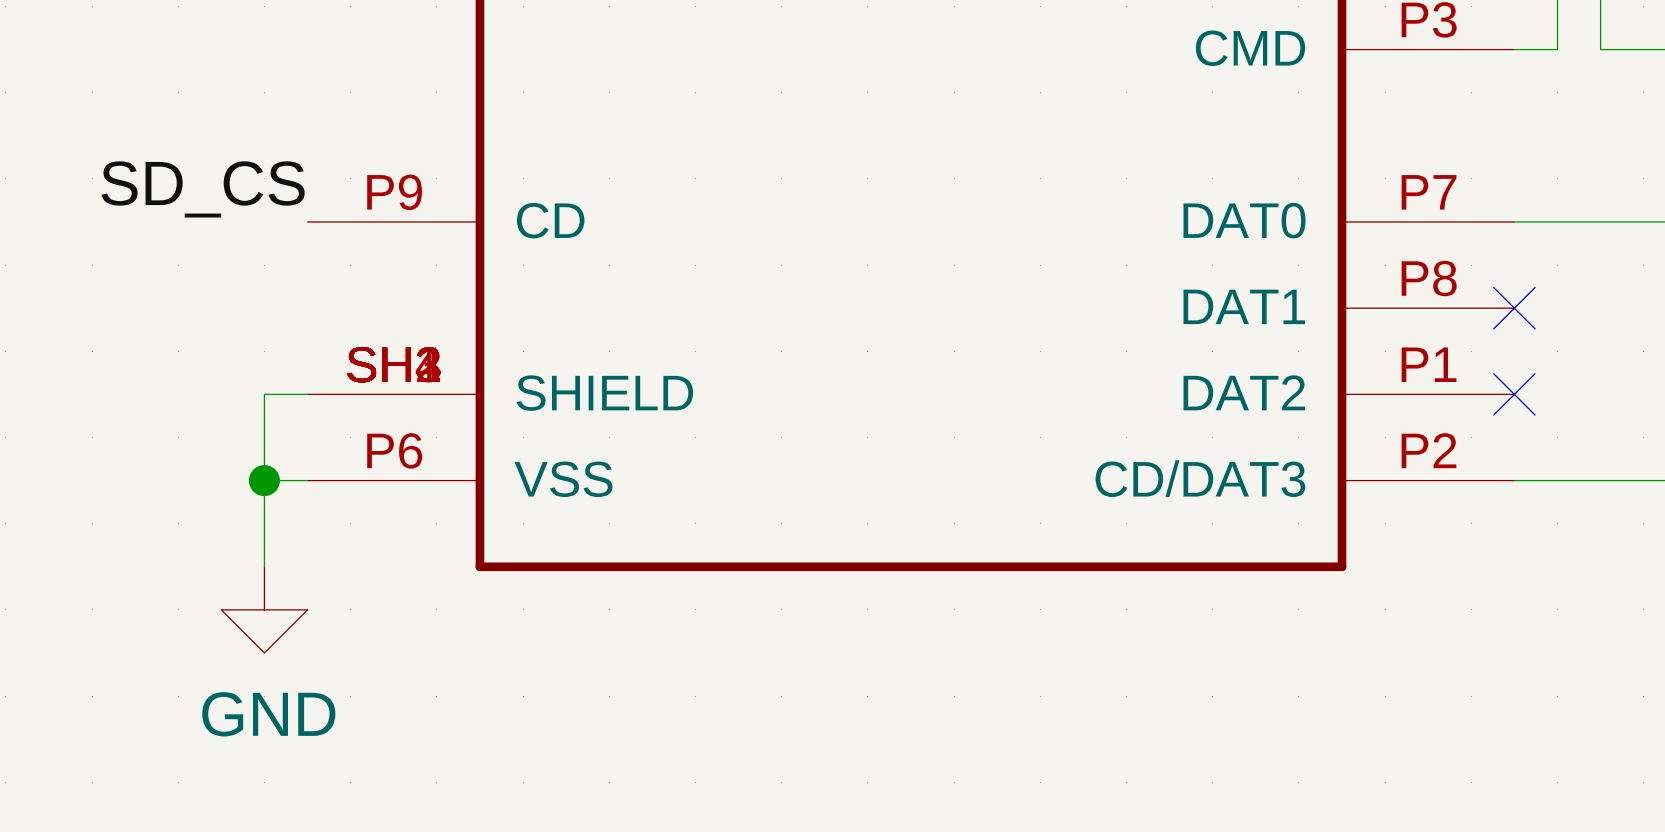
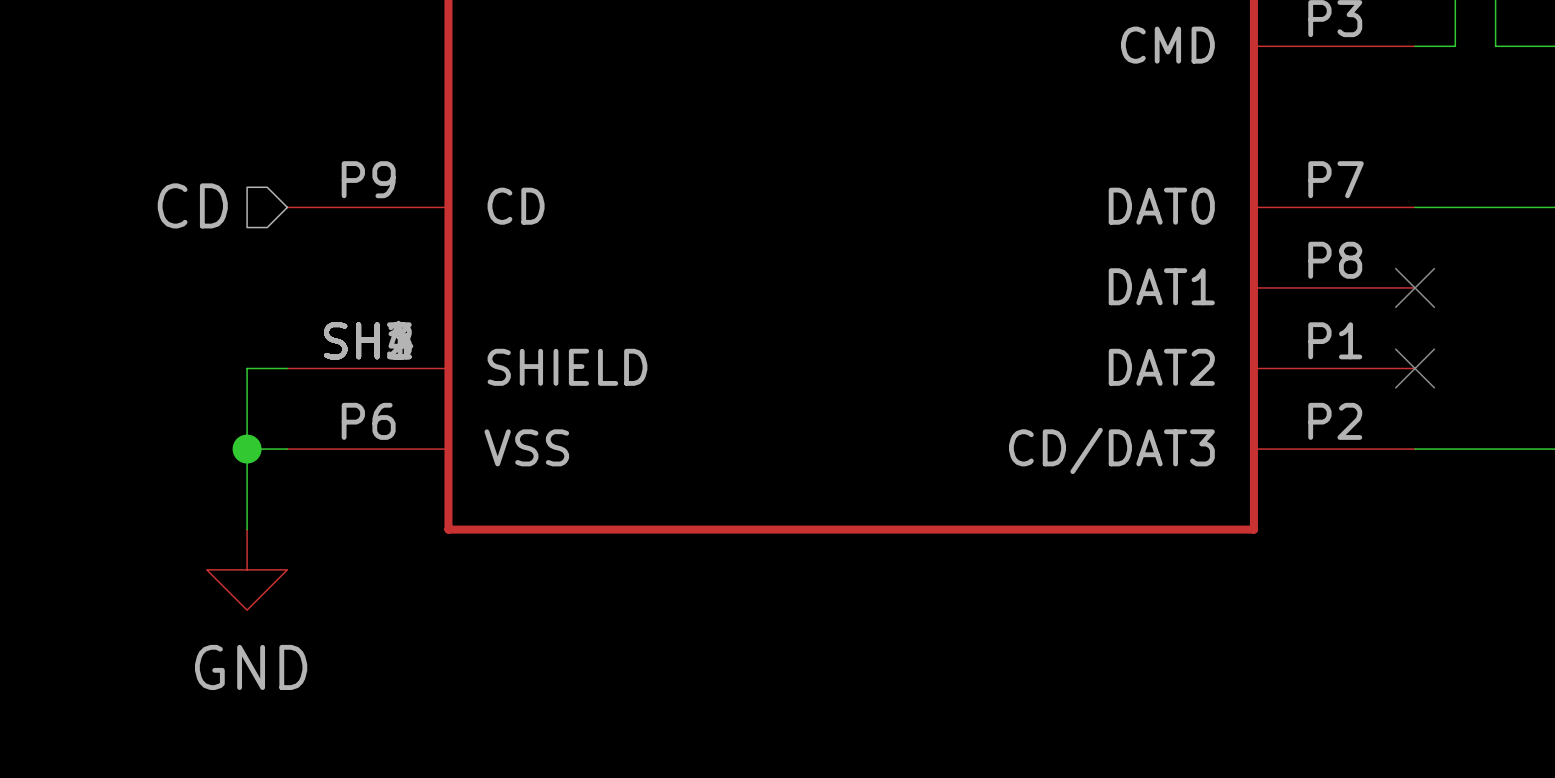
label: SD_CS (203, 189) -> none
hierarchical label: none -> CD (192, 205)

